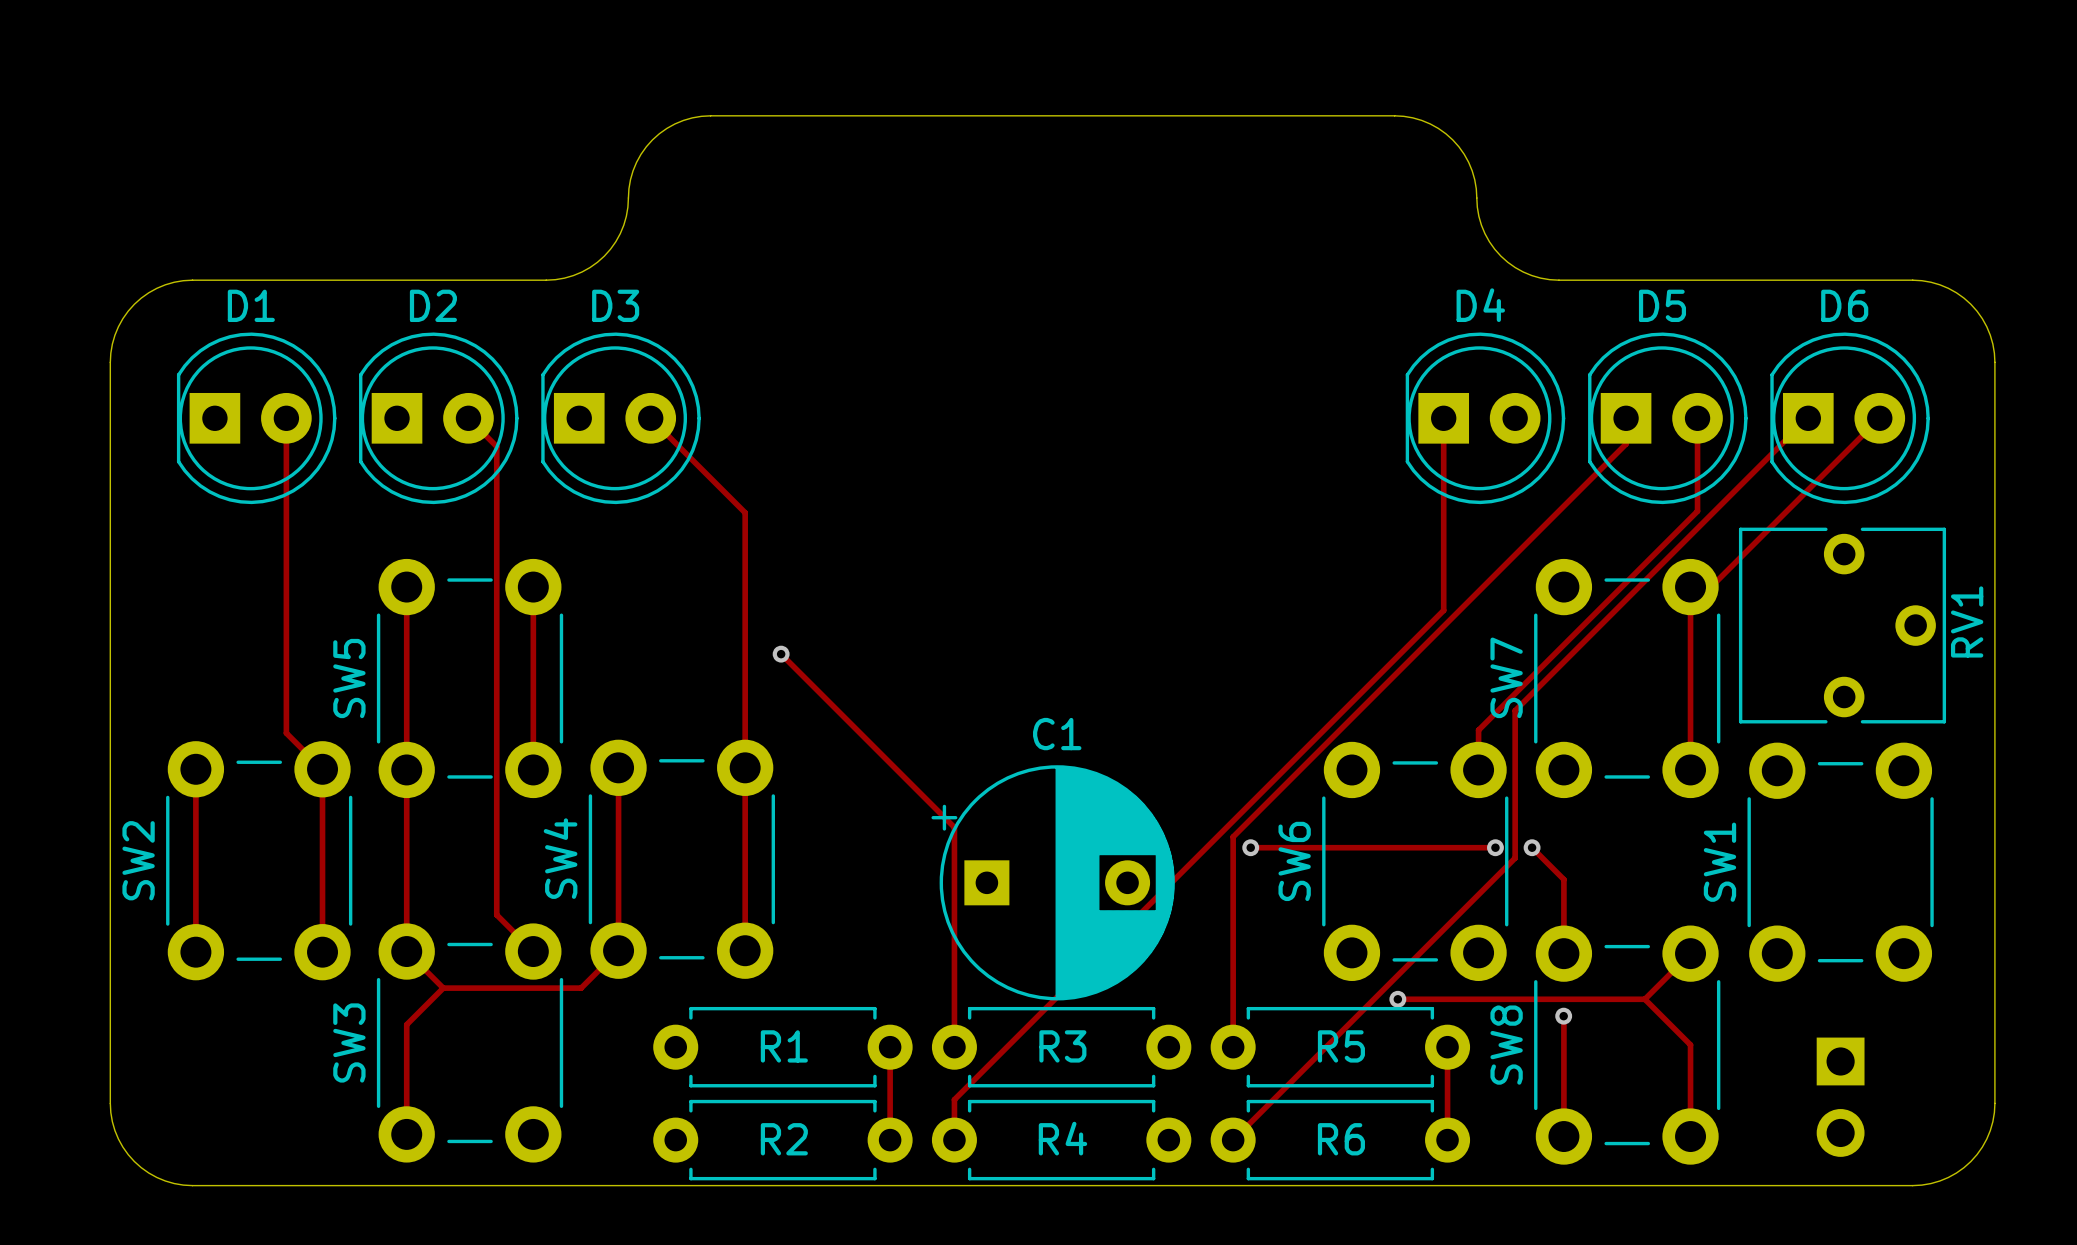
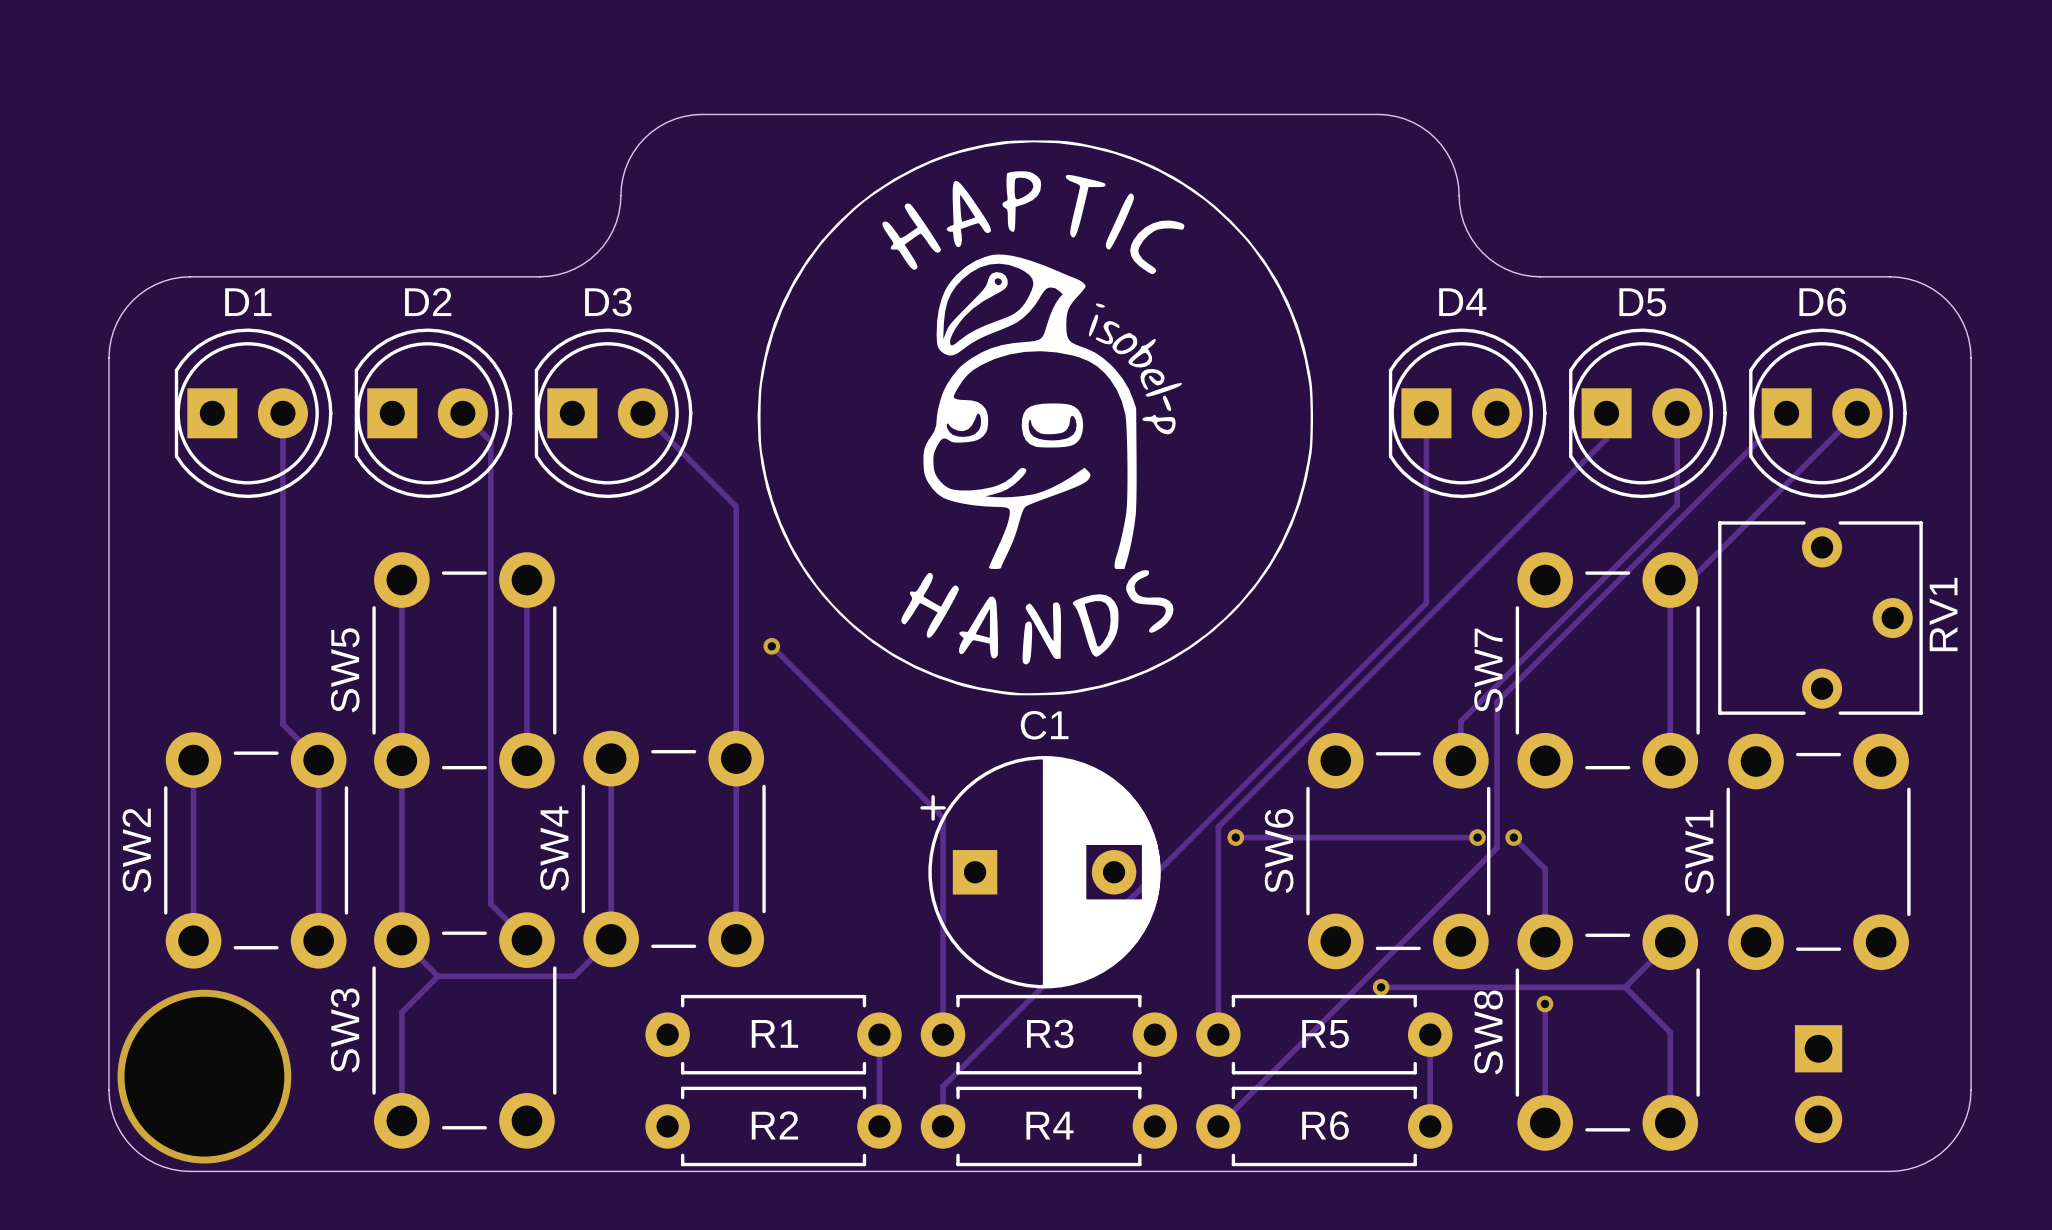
drawing: none -> [757, 140, 1313, 696]
via: none -> (204, 1076)

